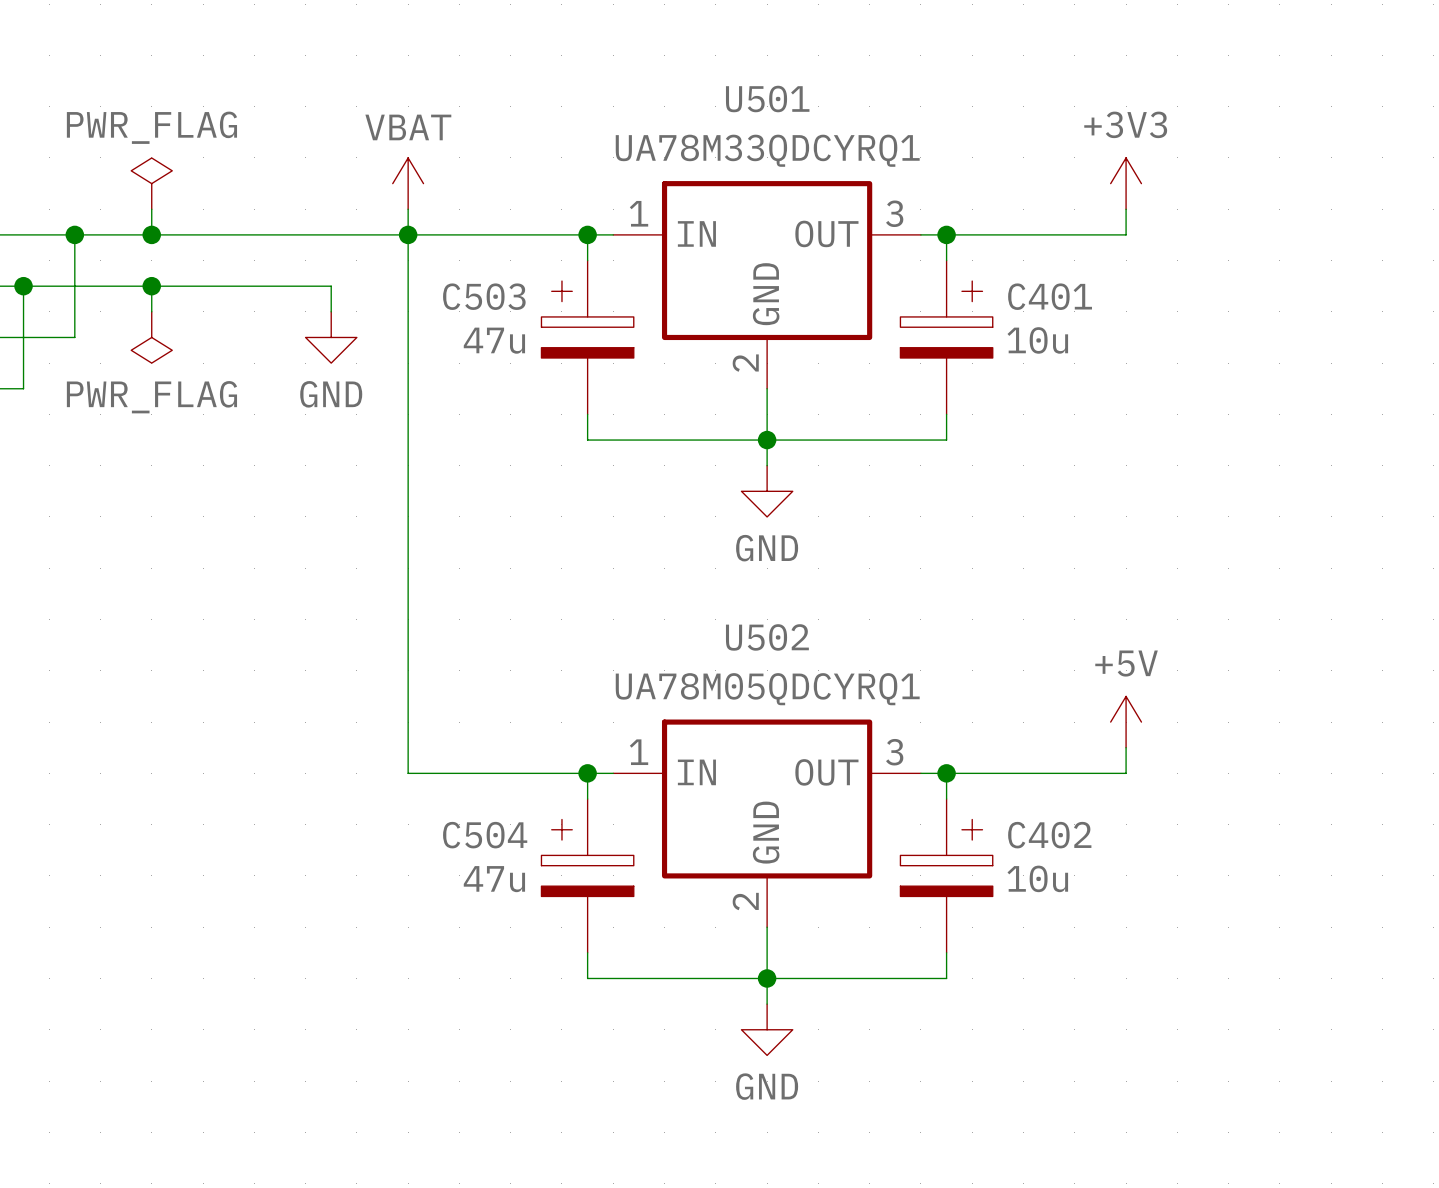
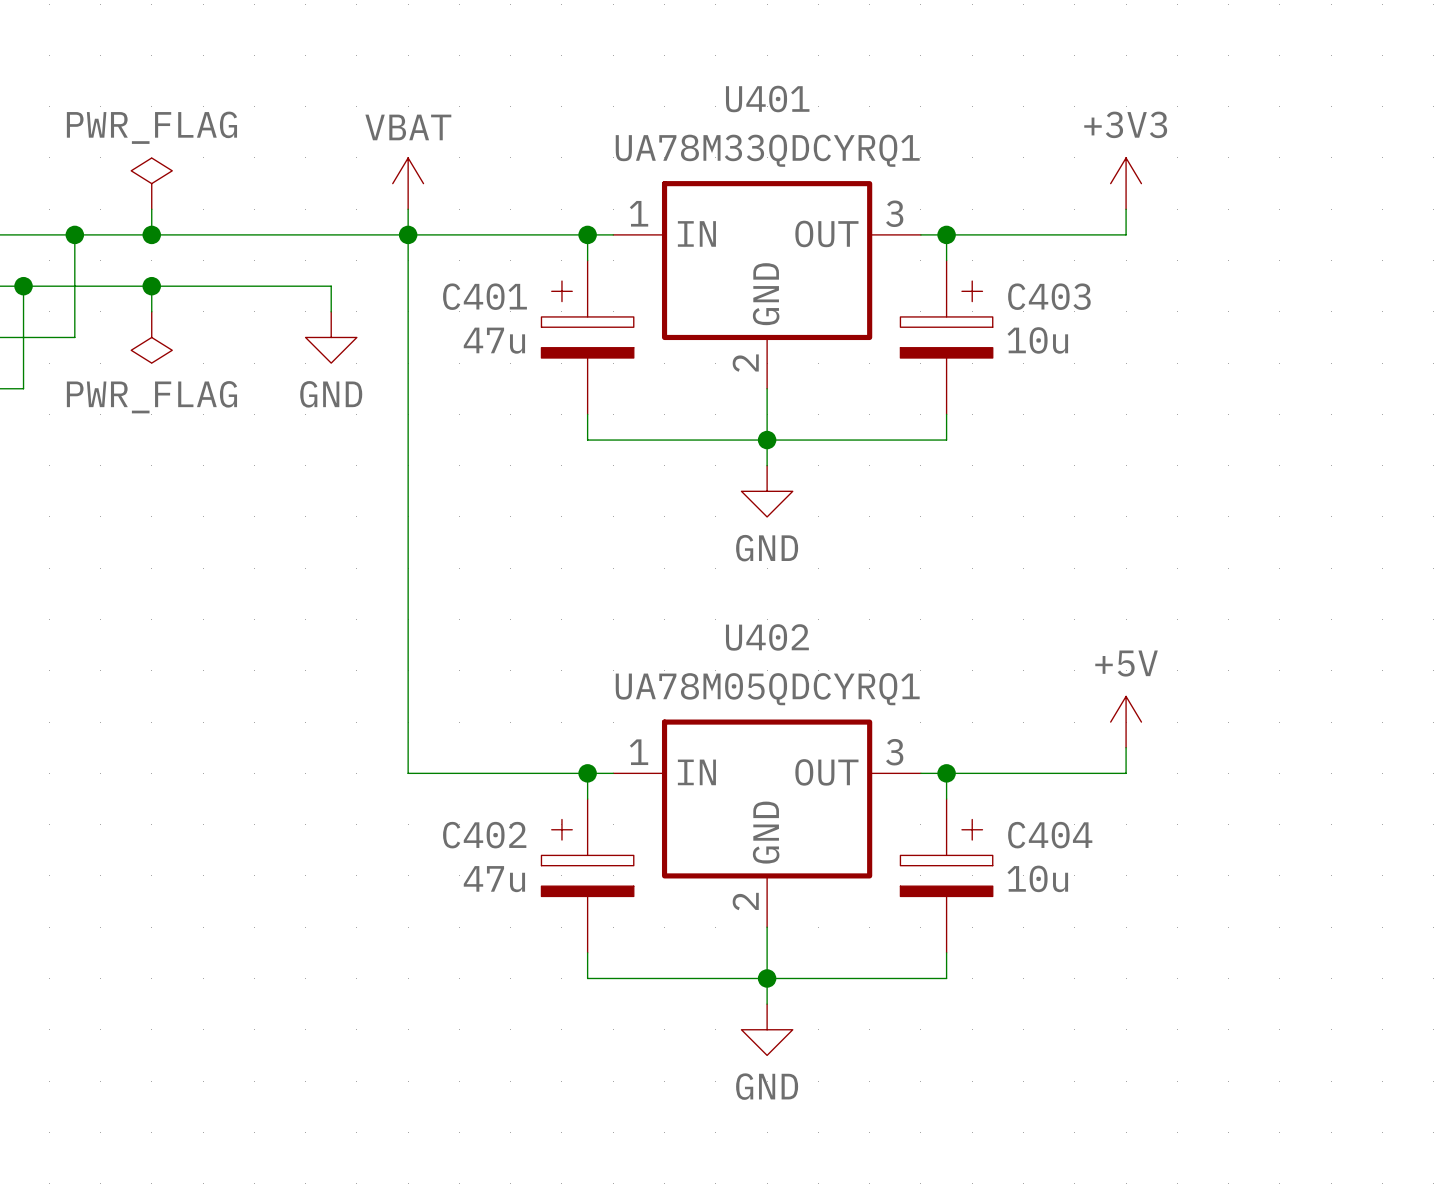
U501 name: U501 (767, 99) -> U401 (767, 99)
C503 name: C503 (484, 296) -> C401 (484, 296)
C401 name: C401 (1050, 296) -> C403 (1049, 296)
U502 name: U502 (767, 637) -> U402 (767, 637)
C504 name: C504 (485, 835) -> C402 (484, 835)
C402 name: C402 (1049, 835) -> C404 (1050, 835)

